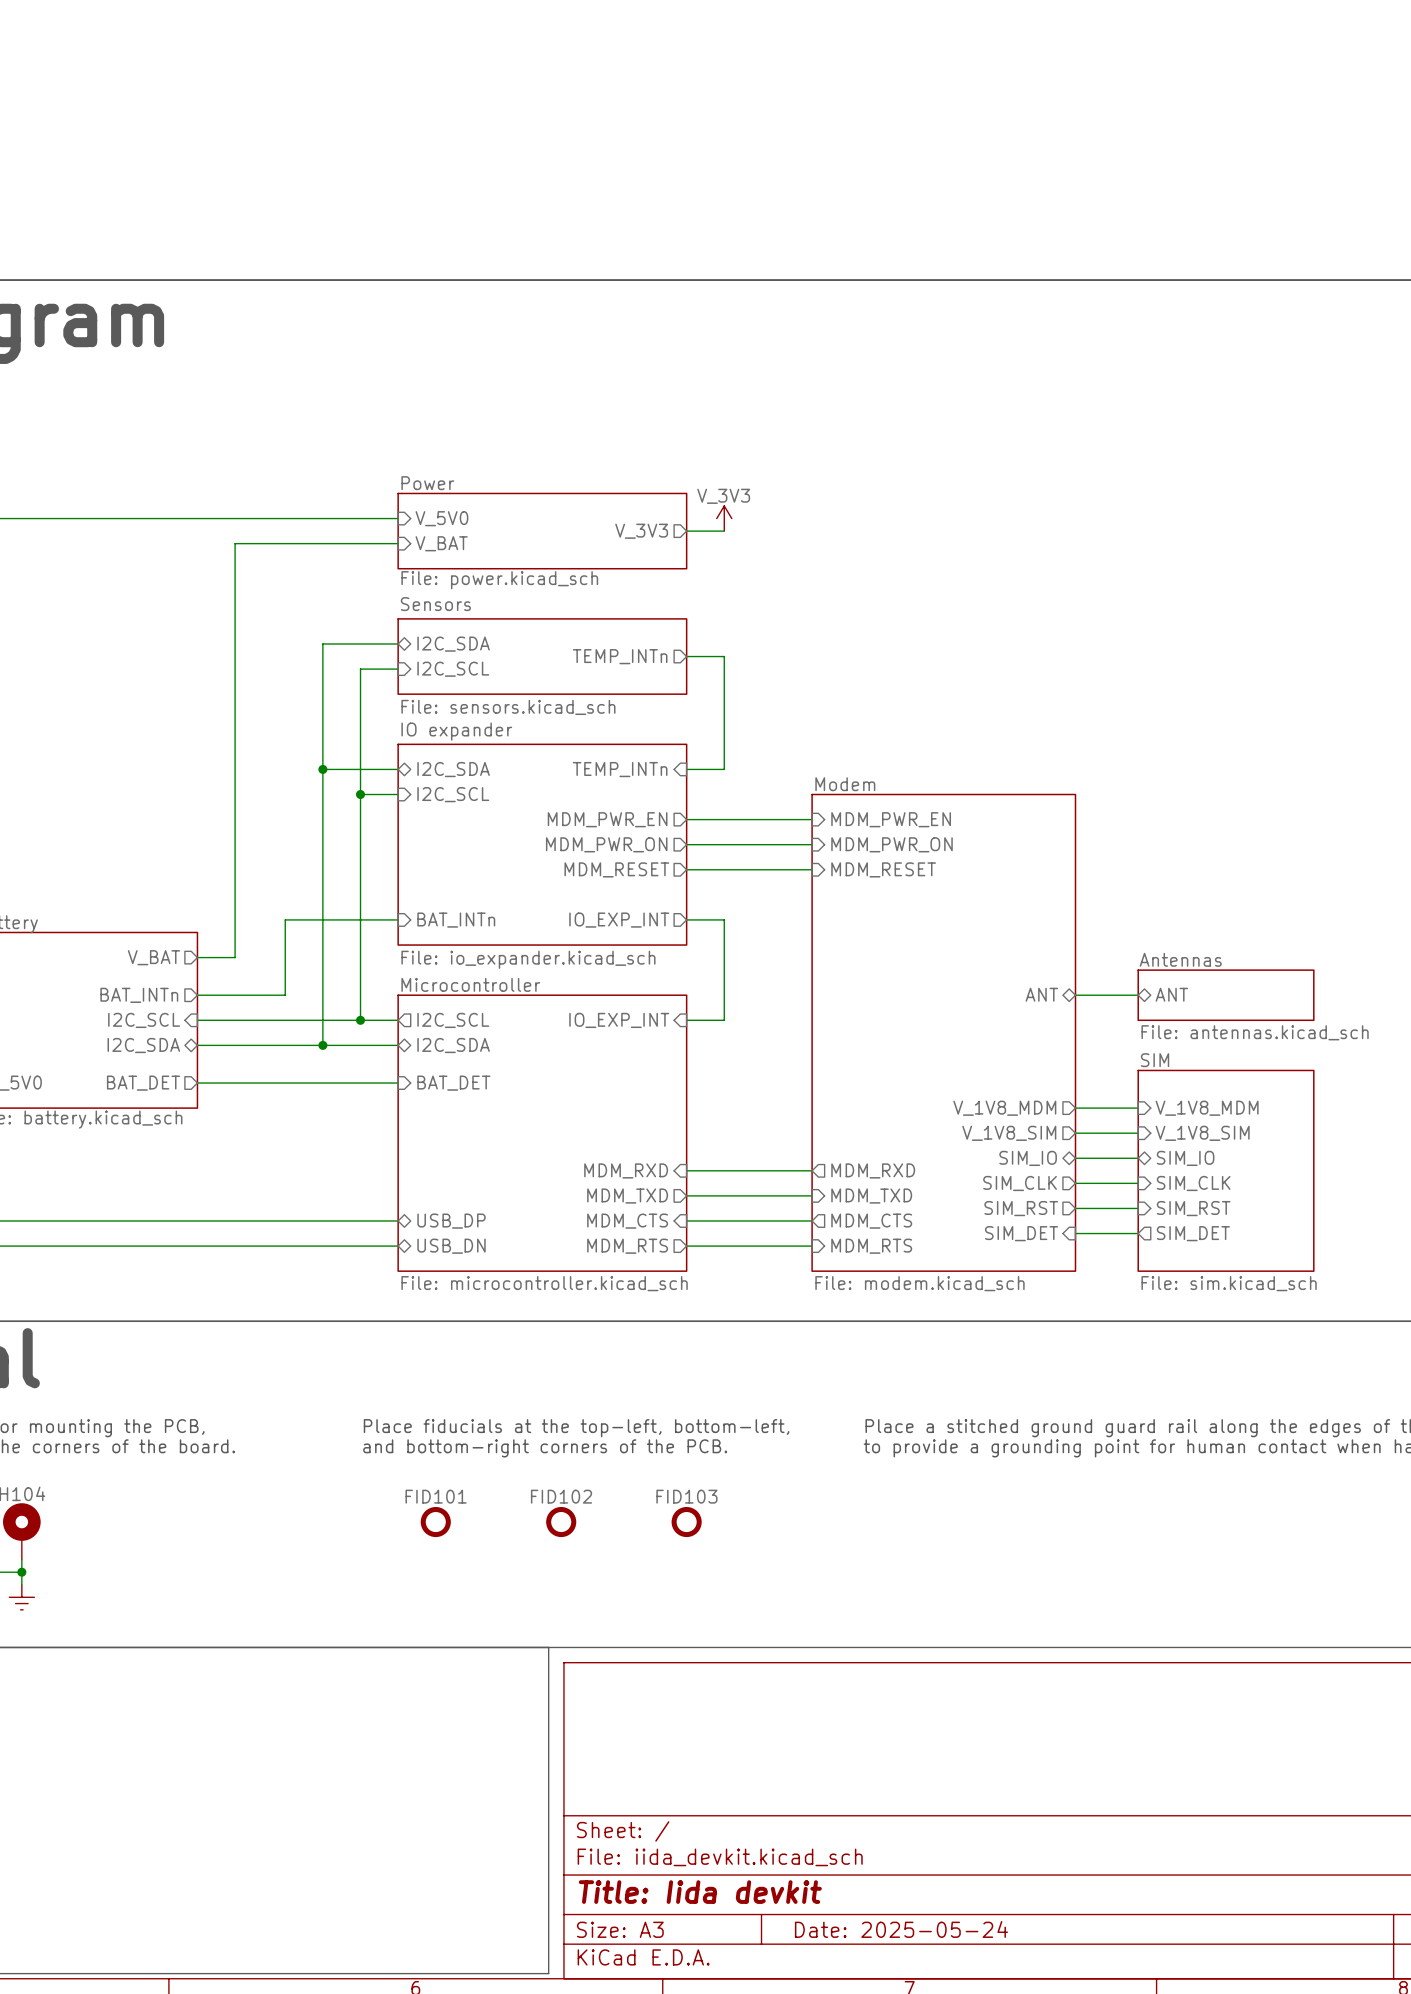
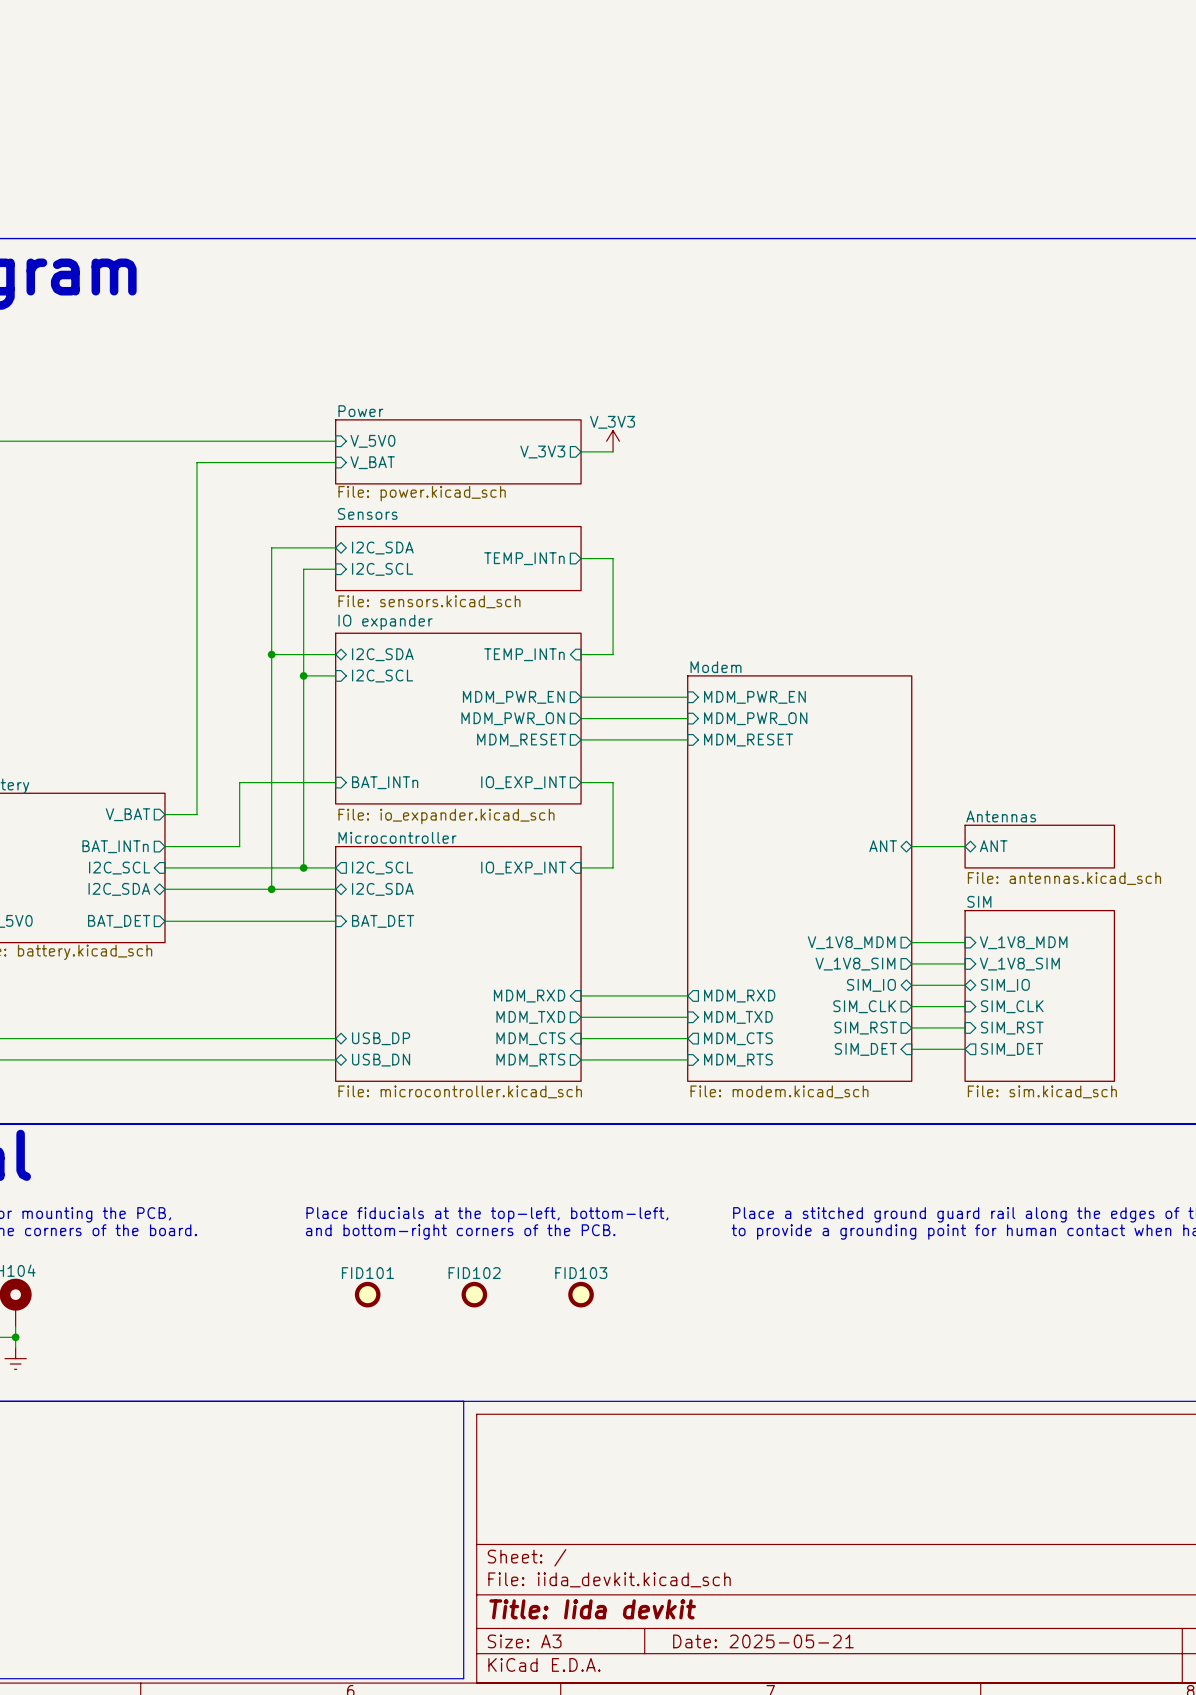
title block: Date: 2025-05-24 (901, 1929) -> Date: 2025-05-21 (763, 1641)

